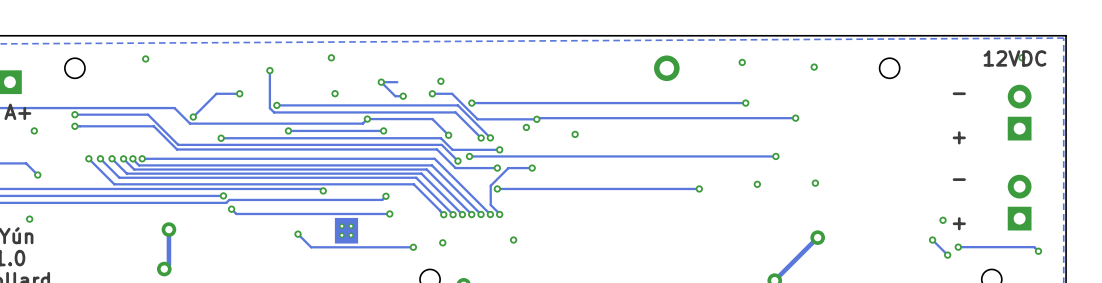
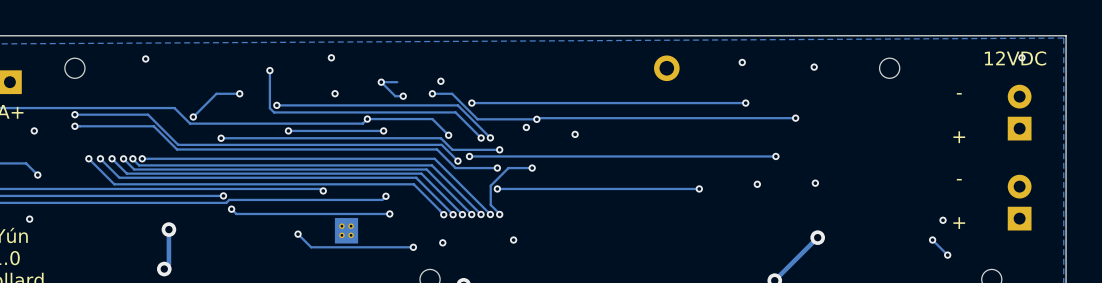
track: (958, 247) (1034, 247) (1038, 251) -> none
via: (958, 247) -> none
via: (1038, 251) -> none

